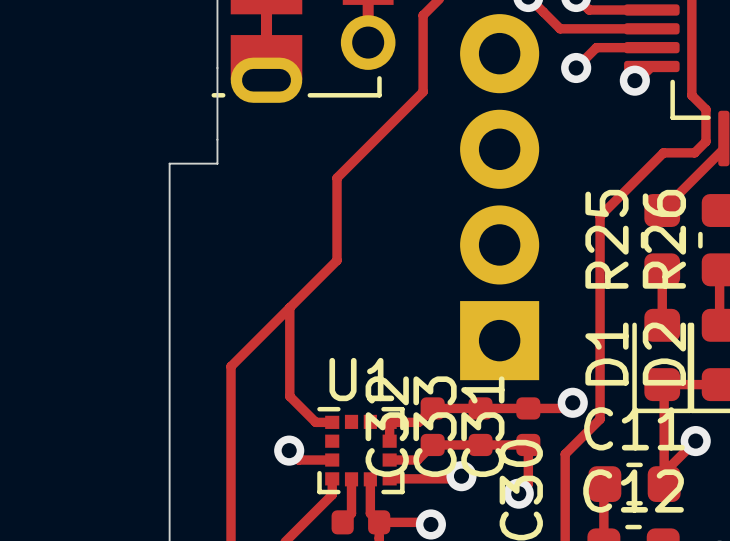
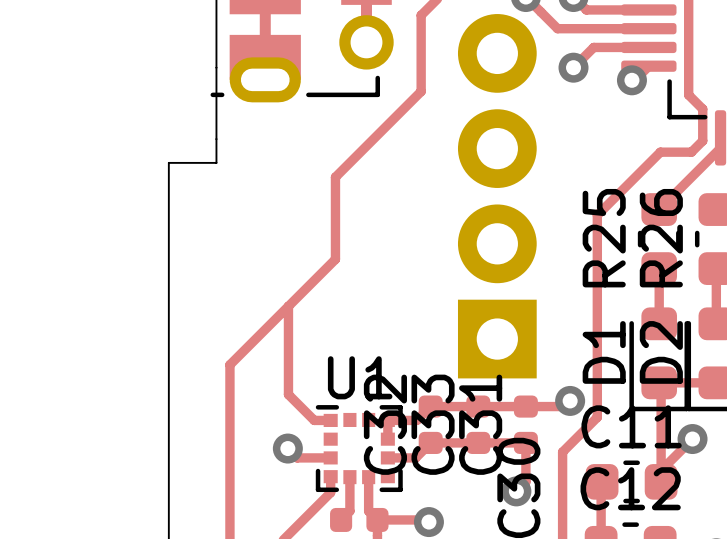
track: (461, 476) (458, 478) (389, 478) -> none
via: (461, 476) -> none

